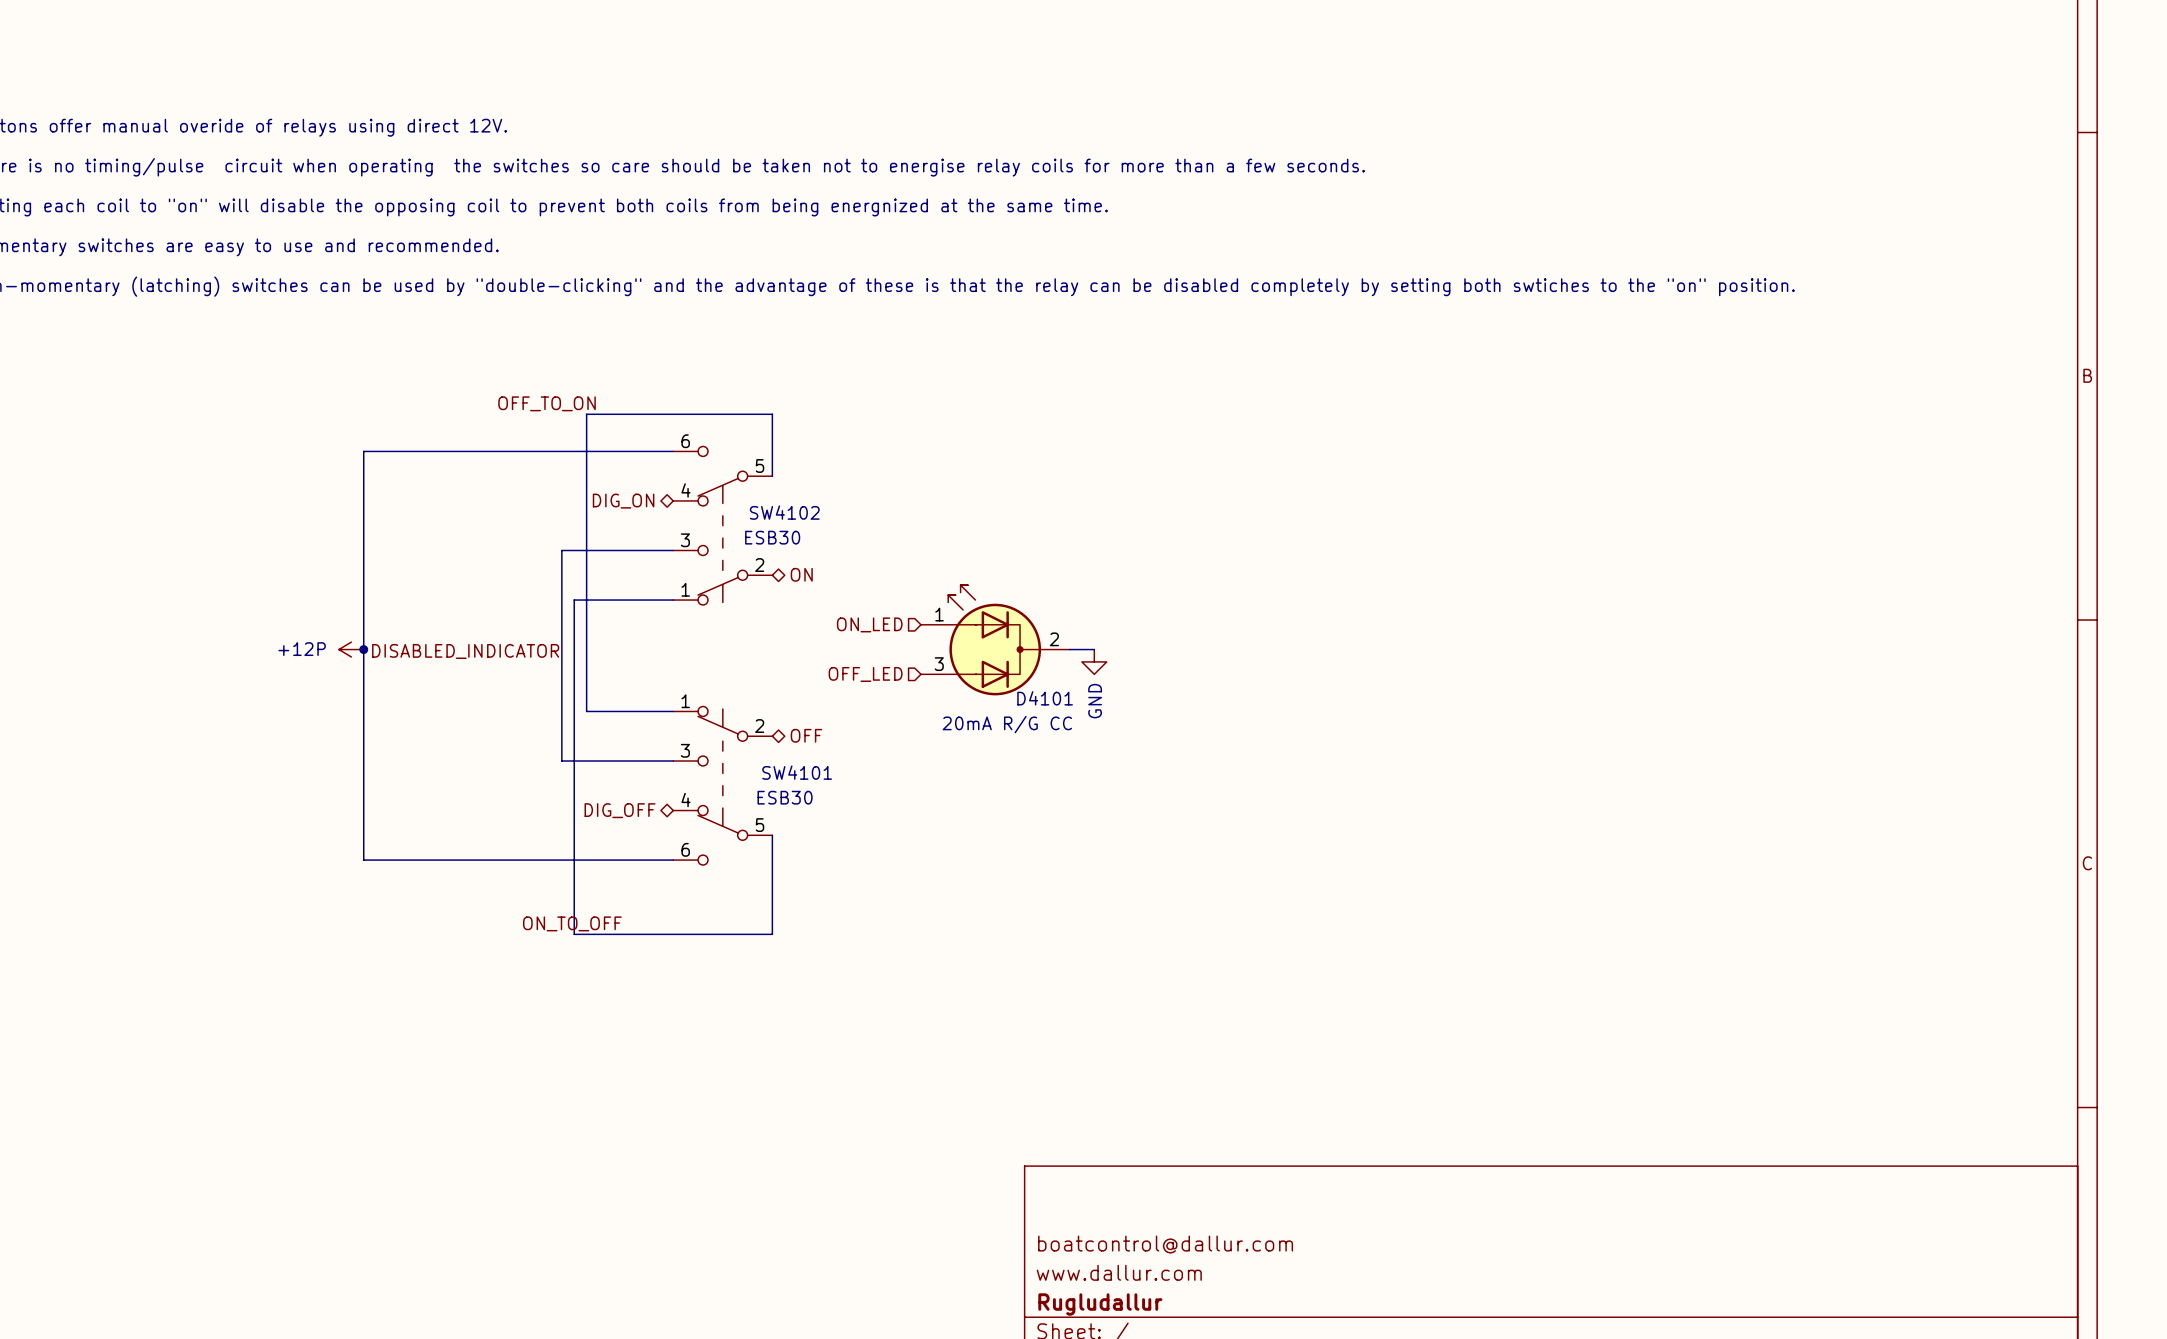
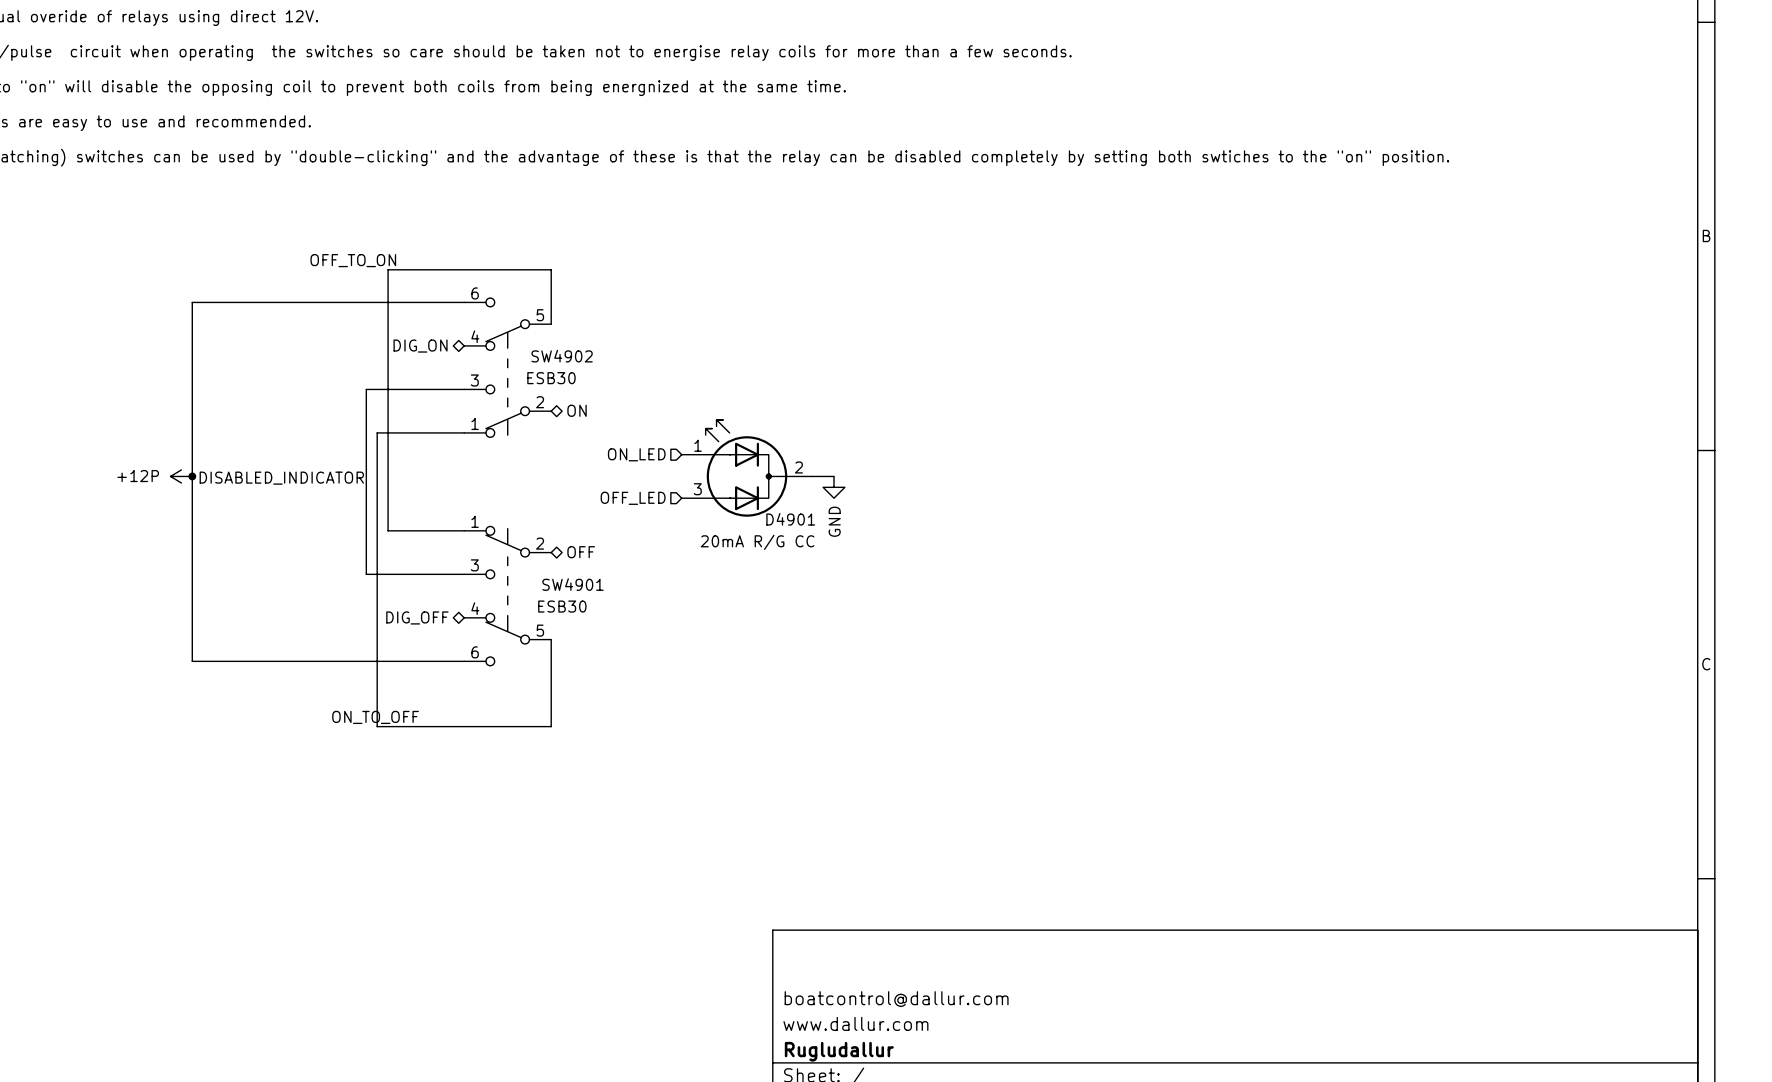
SW4102 name: SW4102 (784, 512) -> SW4902 (562, 356)
D4101 name: D4101 (1045, 698) -> D4901 (790, 519)
SW4101 name: SW4101 (797, 772) -> SW4901 (572, 584)

